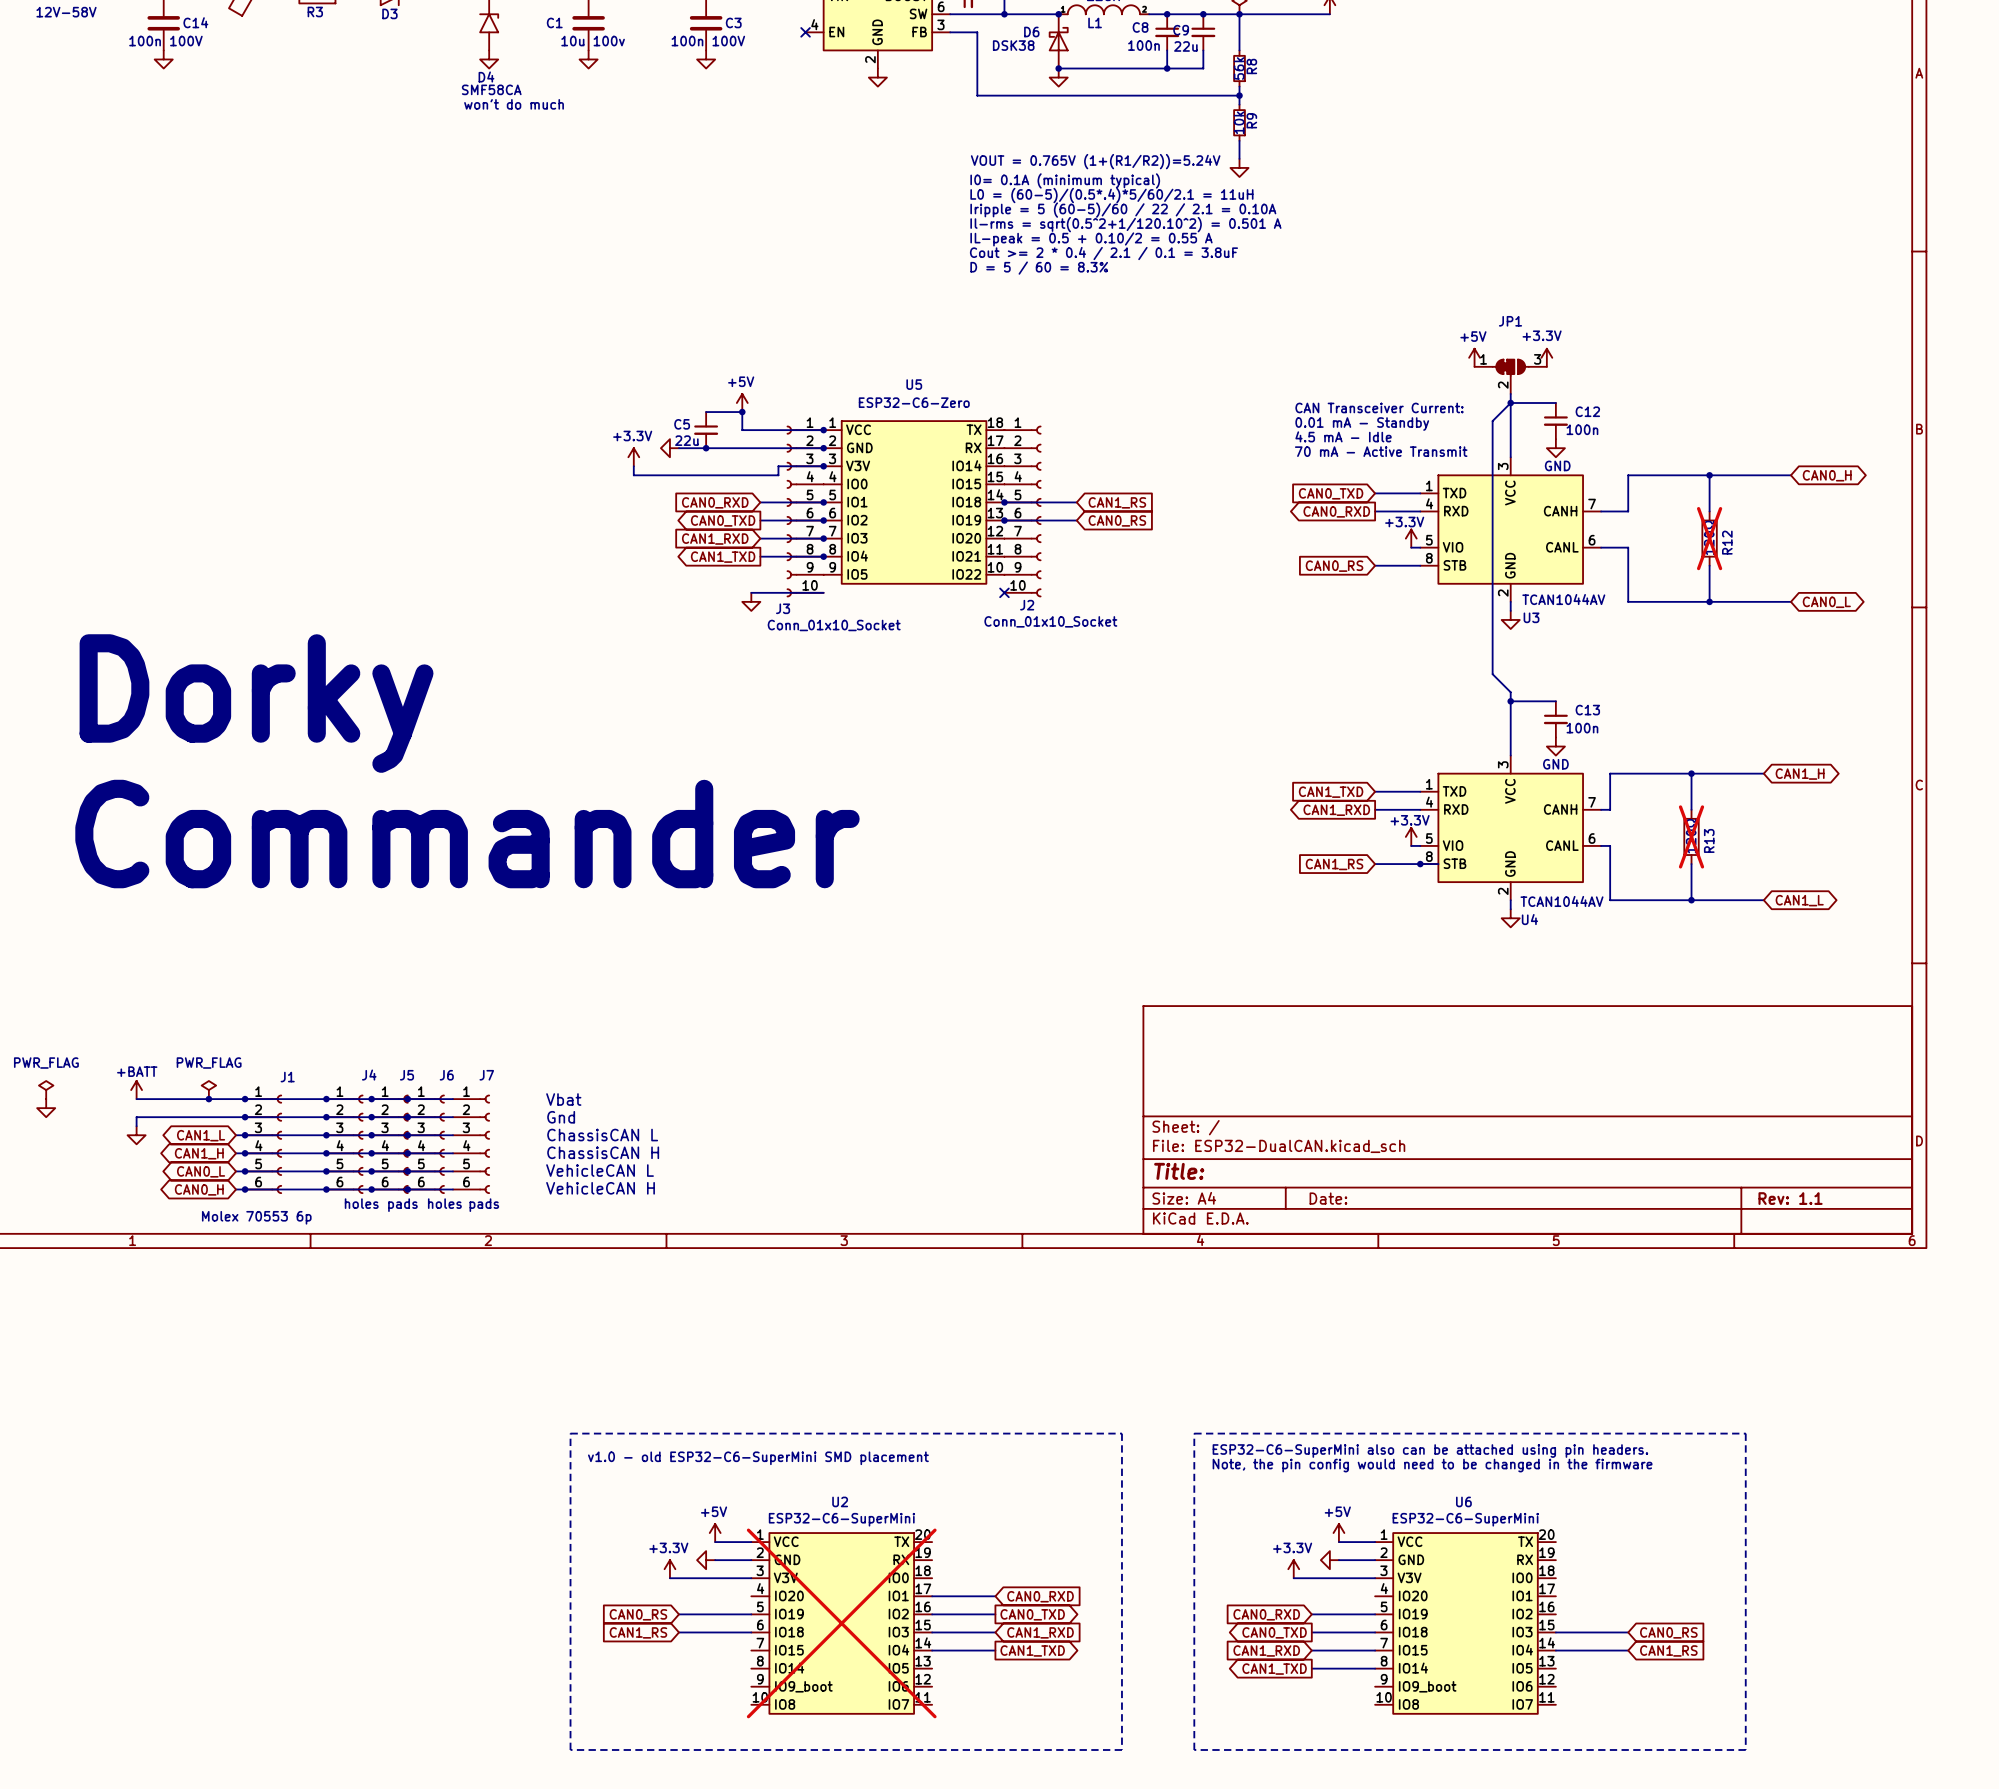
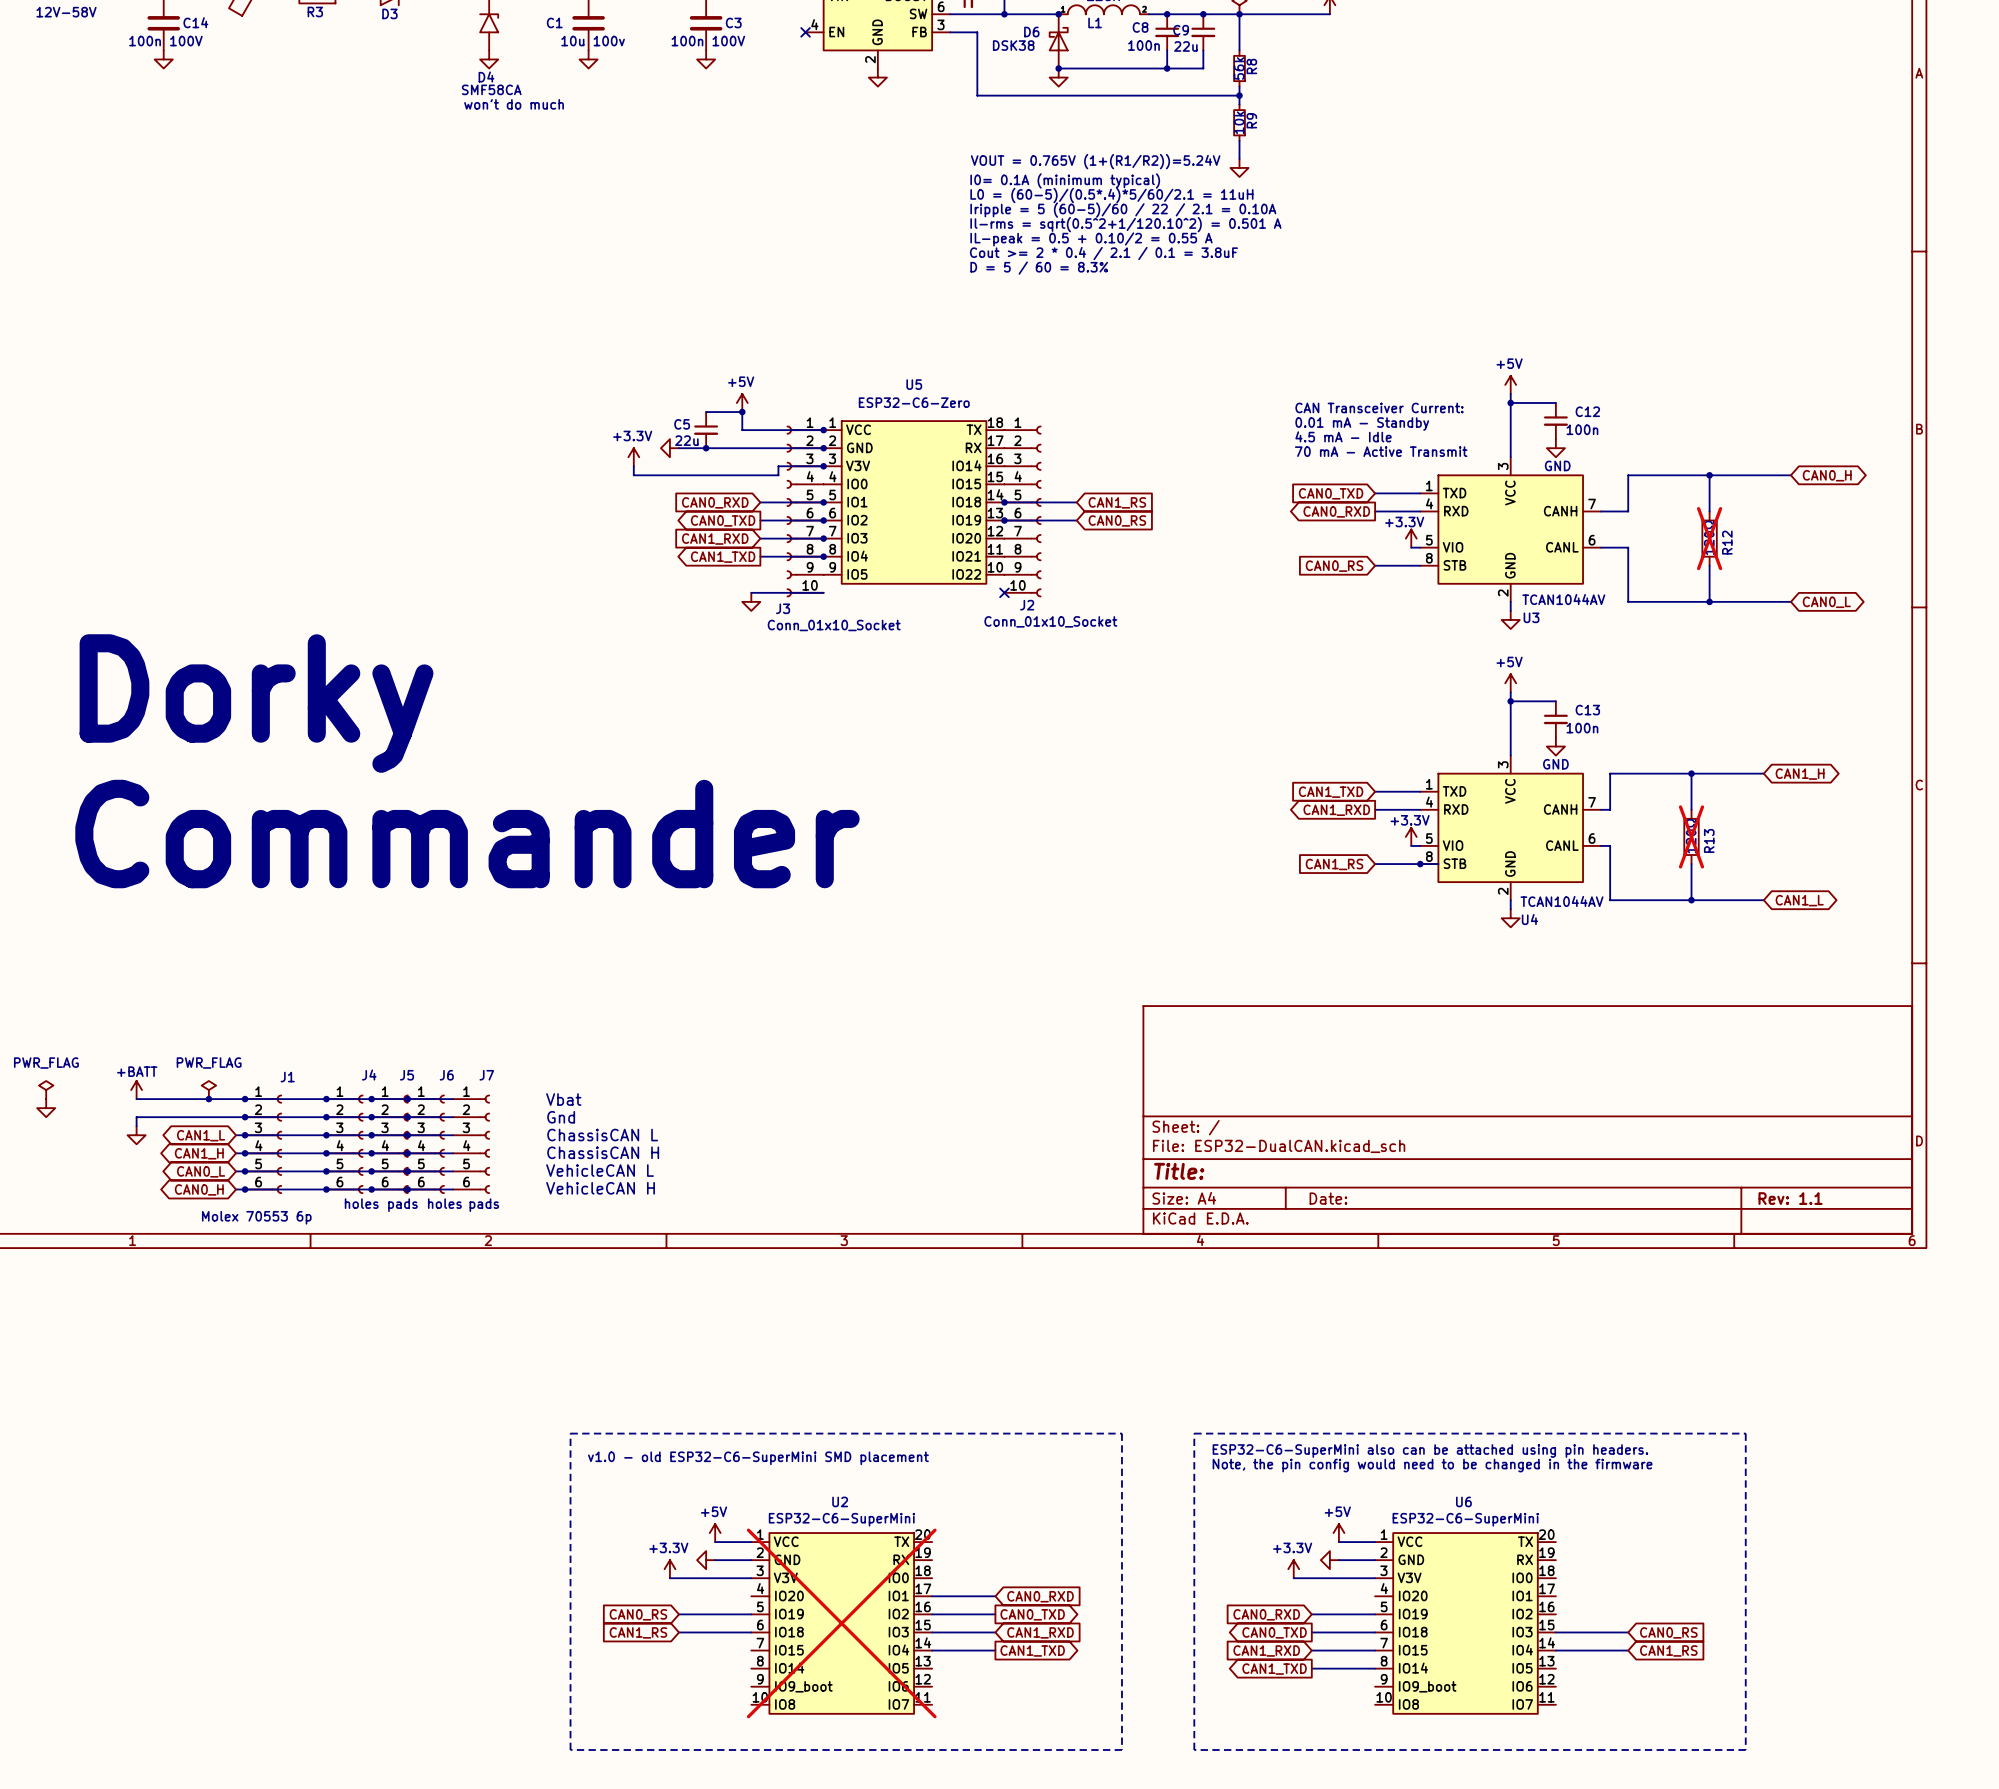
power symbol position: +5V (1474, 357) -> +5V (1510, 384)
power symbol: +3.3V (1546, 357) -> none
JP1: (1510, 376) -> none
wire: (1510, 403) (1492, 421) (1492, 674) (1510, 692) -> none
power symbol: none -> +5V (1510, 683)

